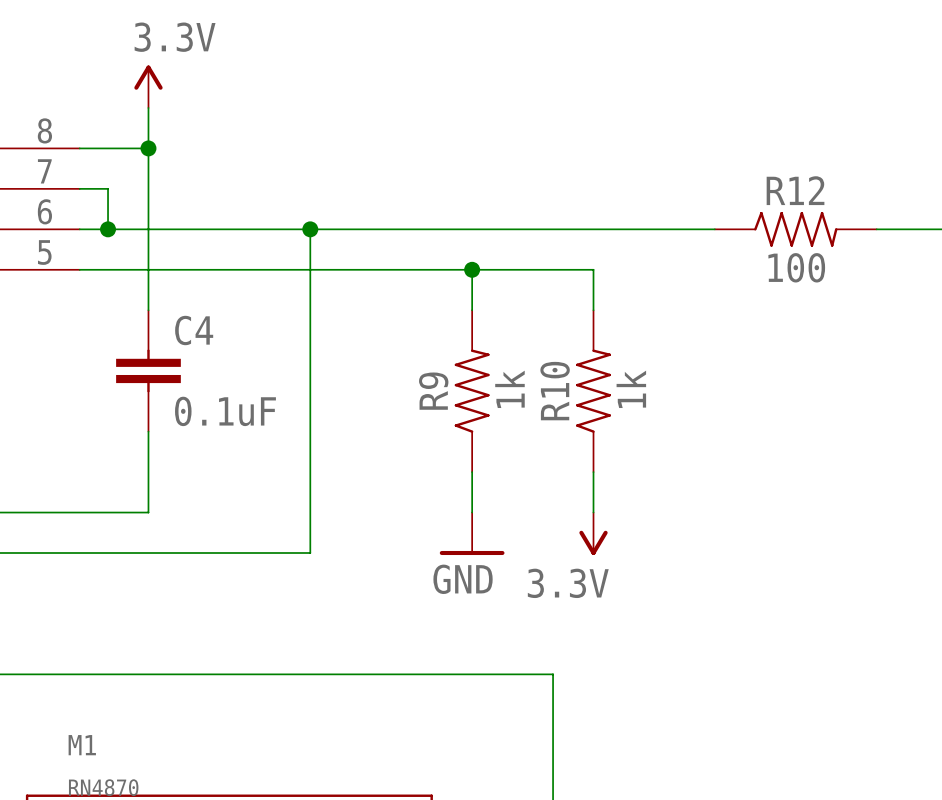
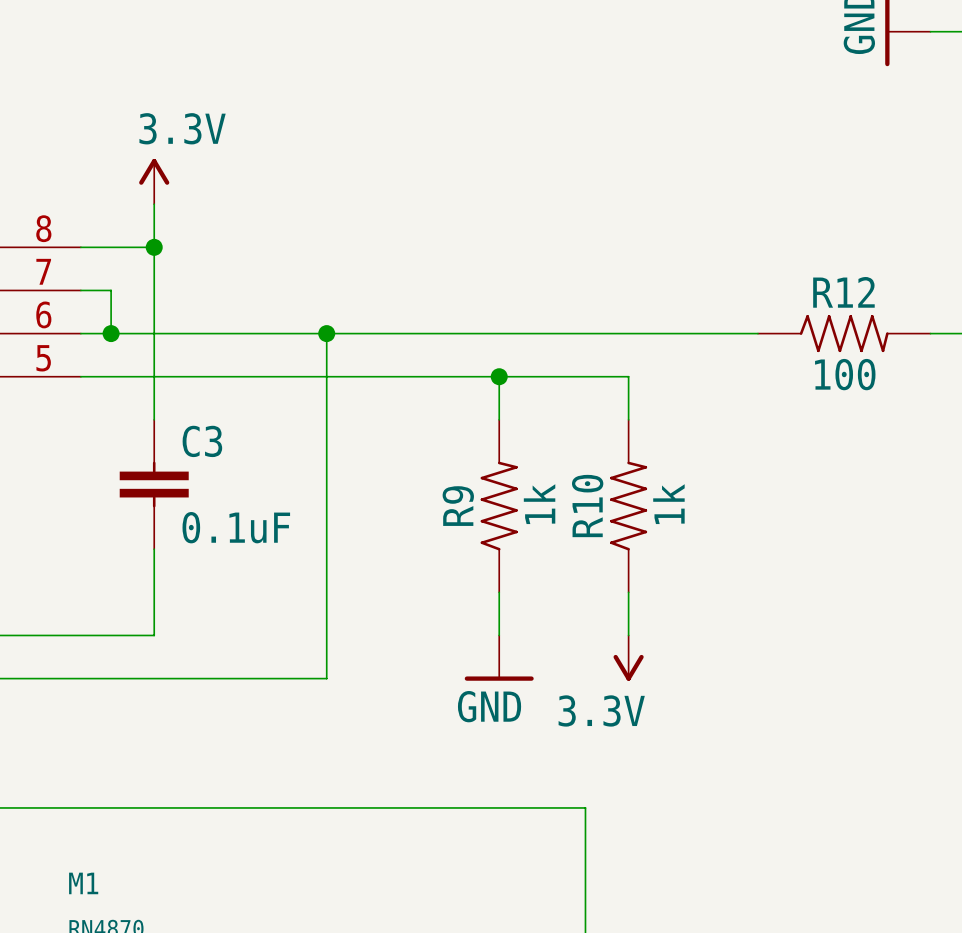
C4 name: C4 (194, 330) -> C3 (202, 441)

